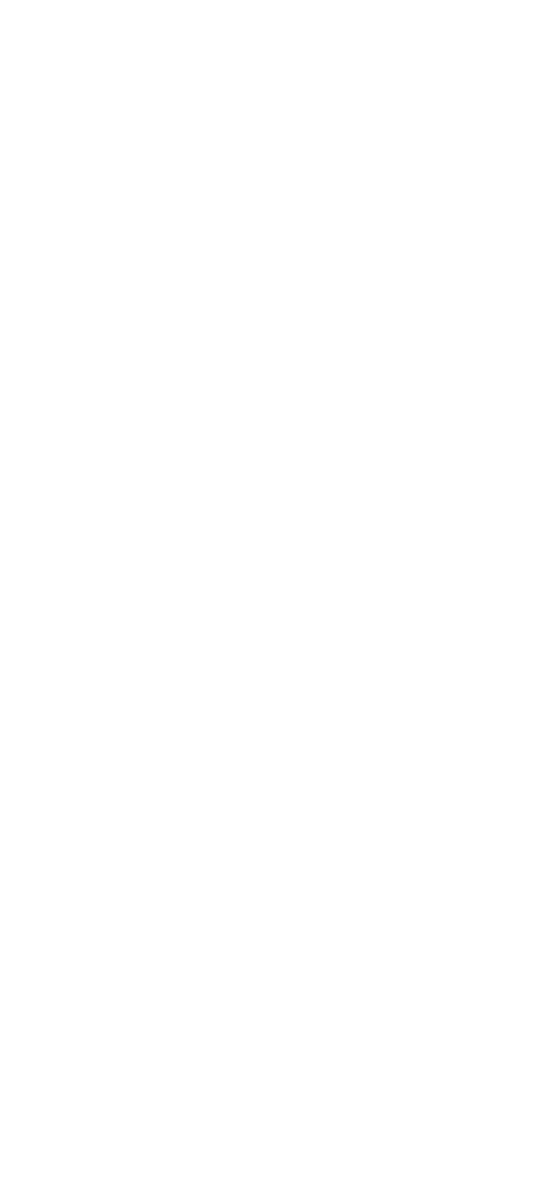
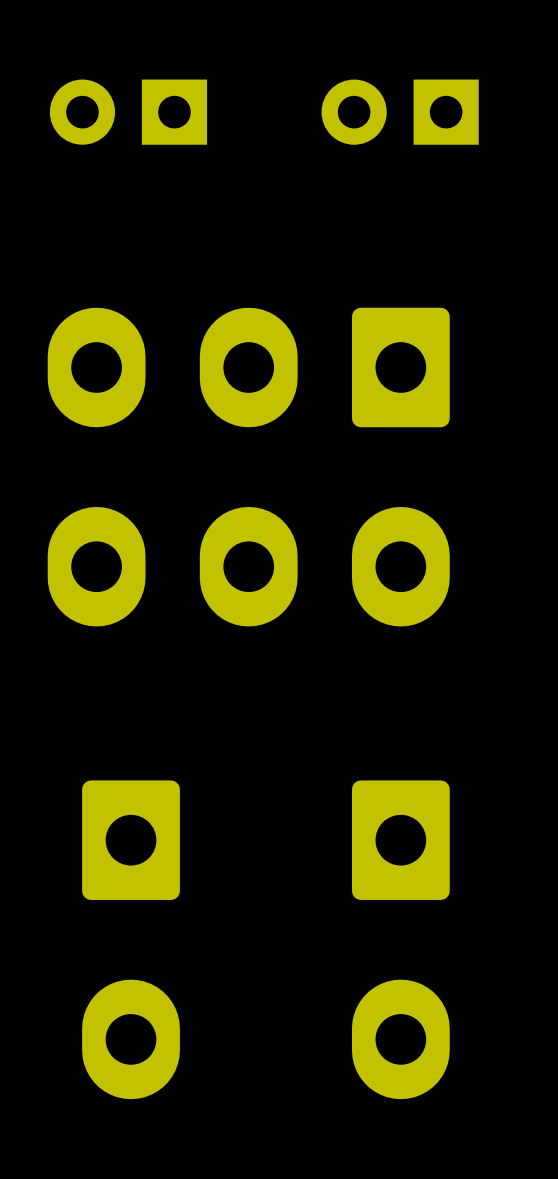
part: none -> (128, 112)
part: none -> (400, 112)
part: none -> (248, 467)
part: none -> (131, 939)
part: none -> (400, 939)

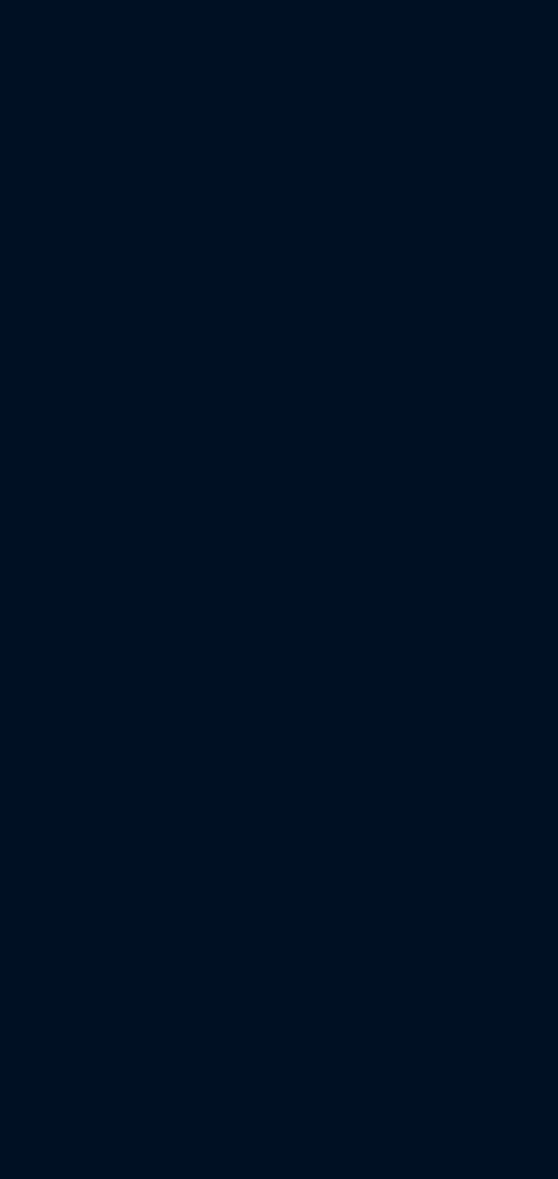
part: (128, 112) -> none
part: (400, 112) -> none
part: (248, 467) -> none
part: (131, 939) -> none
part: (400, 939) -> none

